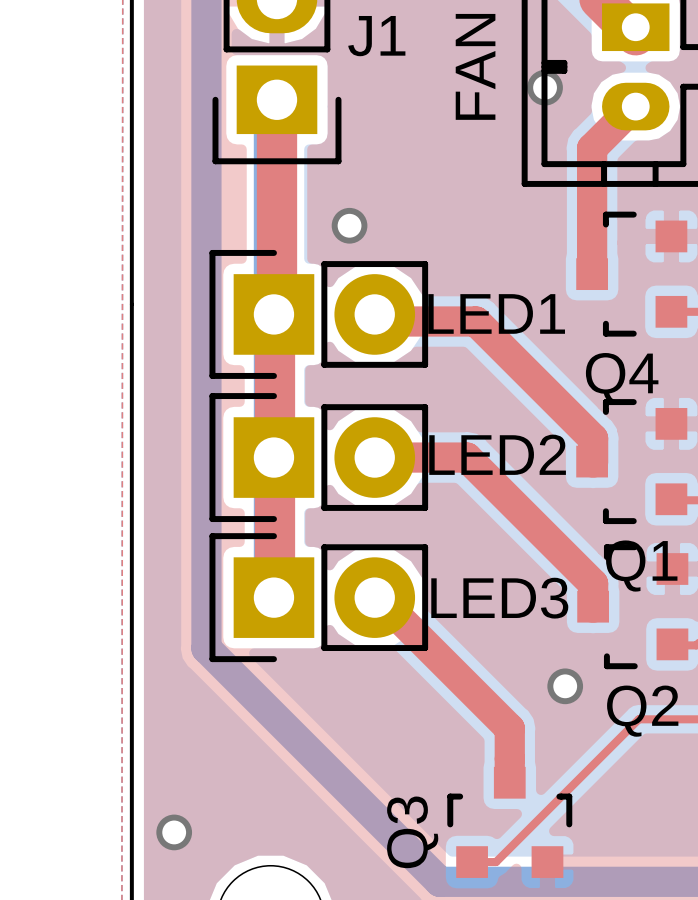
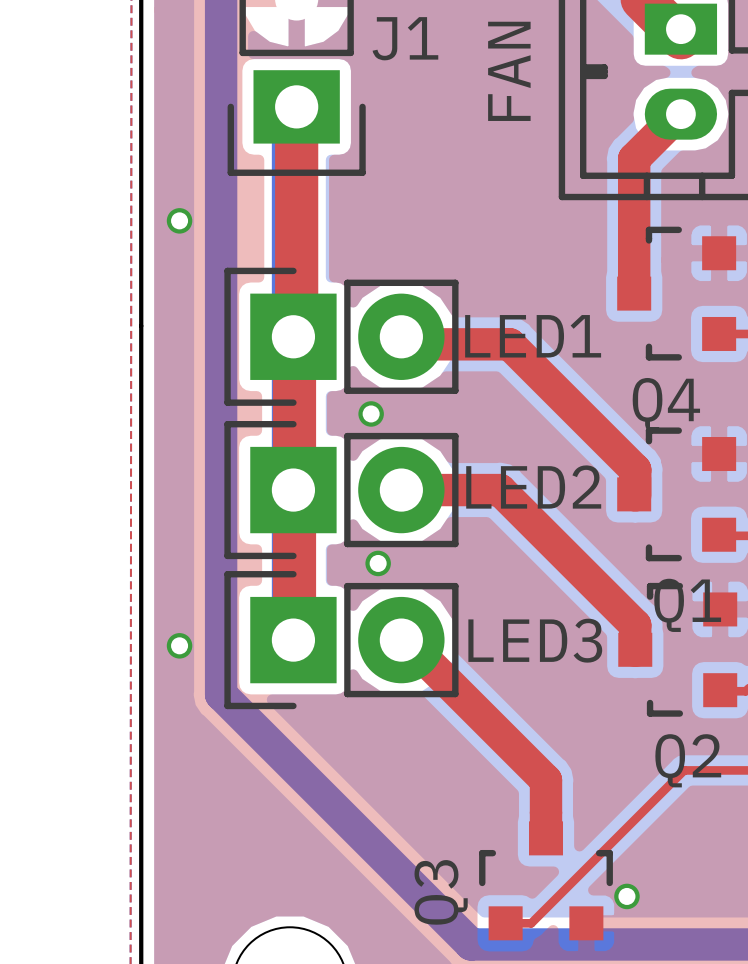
via: (545, 87) -> none
via: none -> (179, 220)
via: (349, 225) -> none
via: none -> (371, 413)
via: none -> (378, 563)
via: none -> (179, 645)
via: (565, 686) -> none
via: (174, 832) -> none
via: none -> (626, 896)

